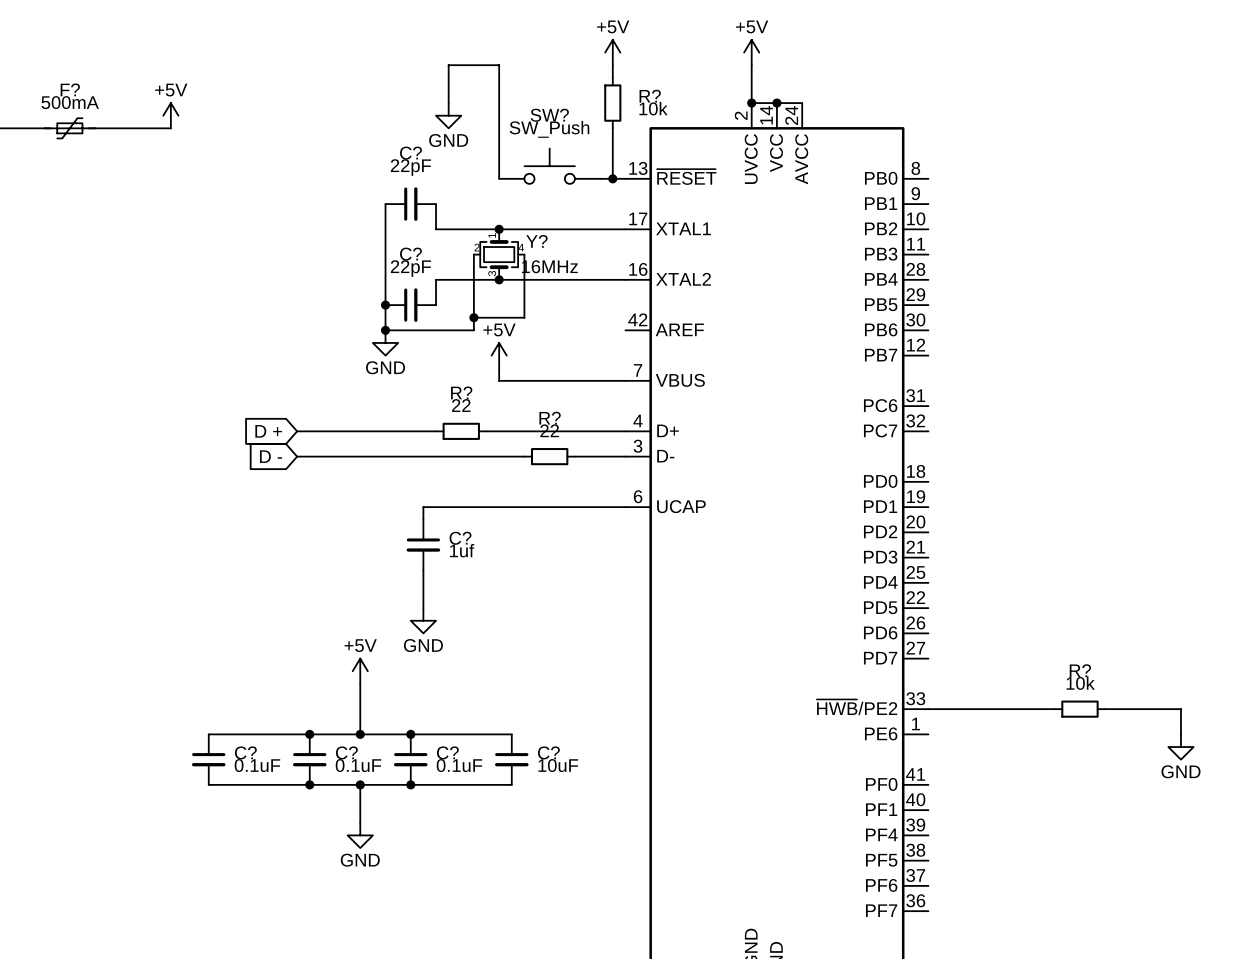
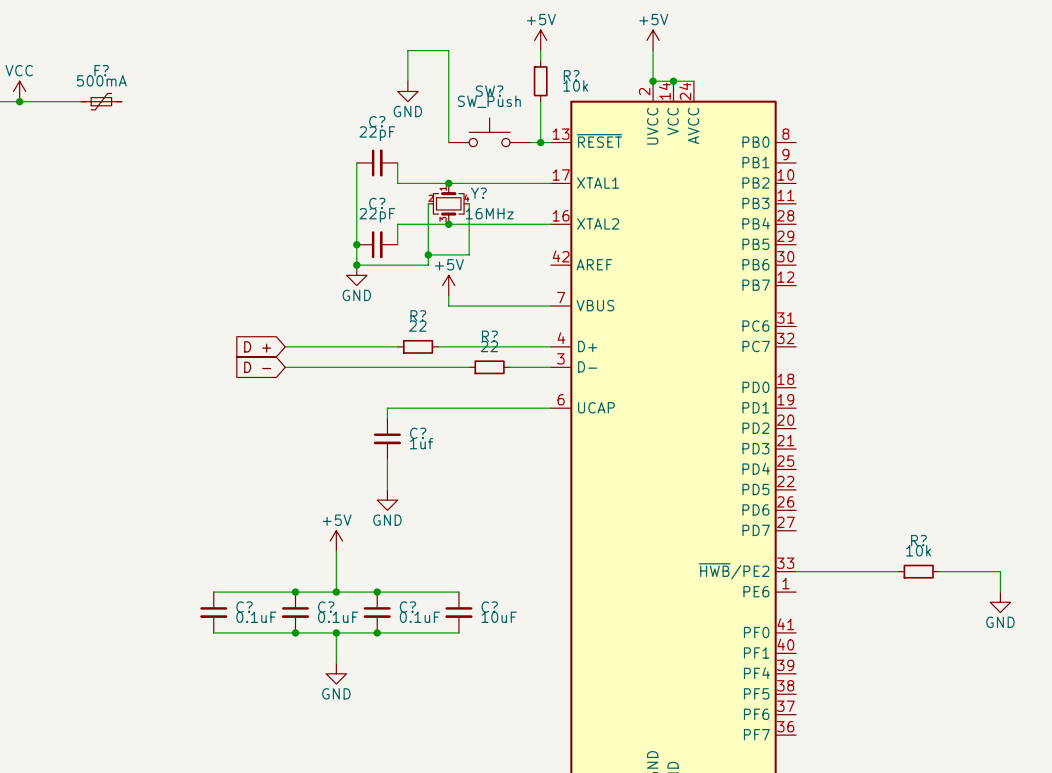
power symbol: +5V (170, 115) -> none
wire: (95, 128) (170, 128) -> none

